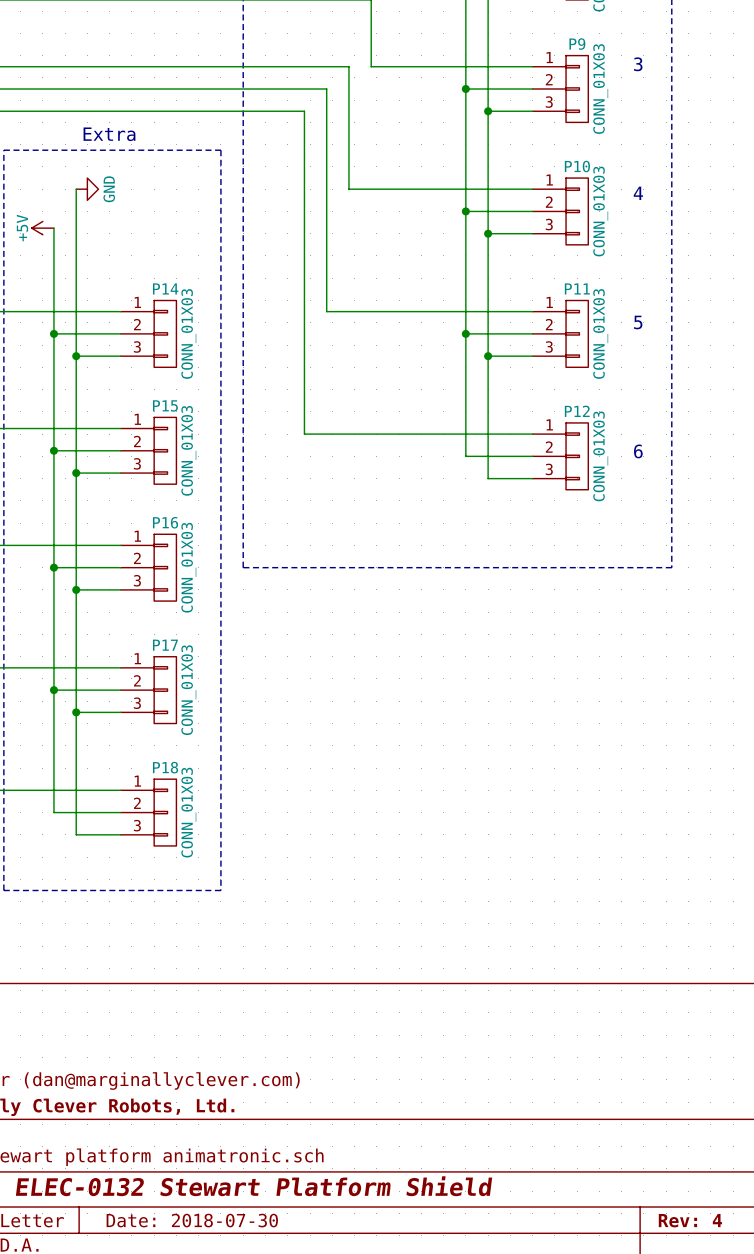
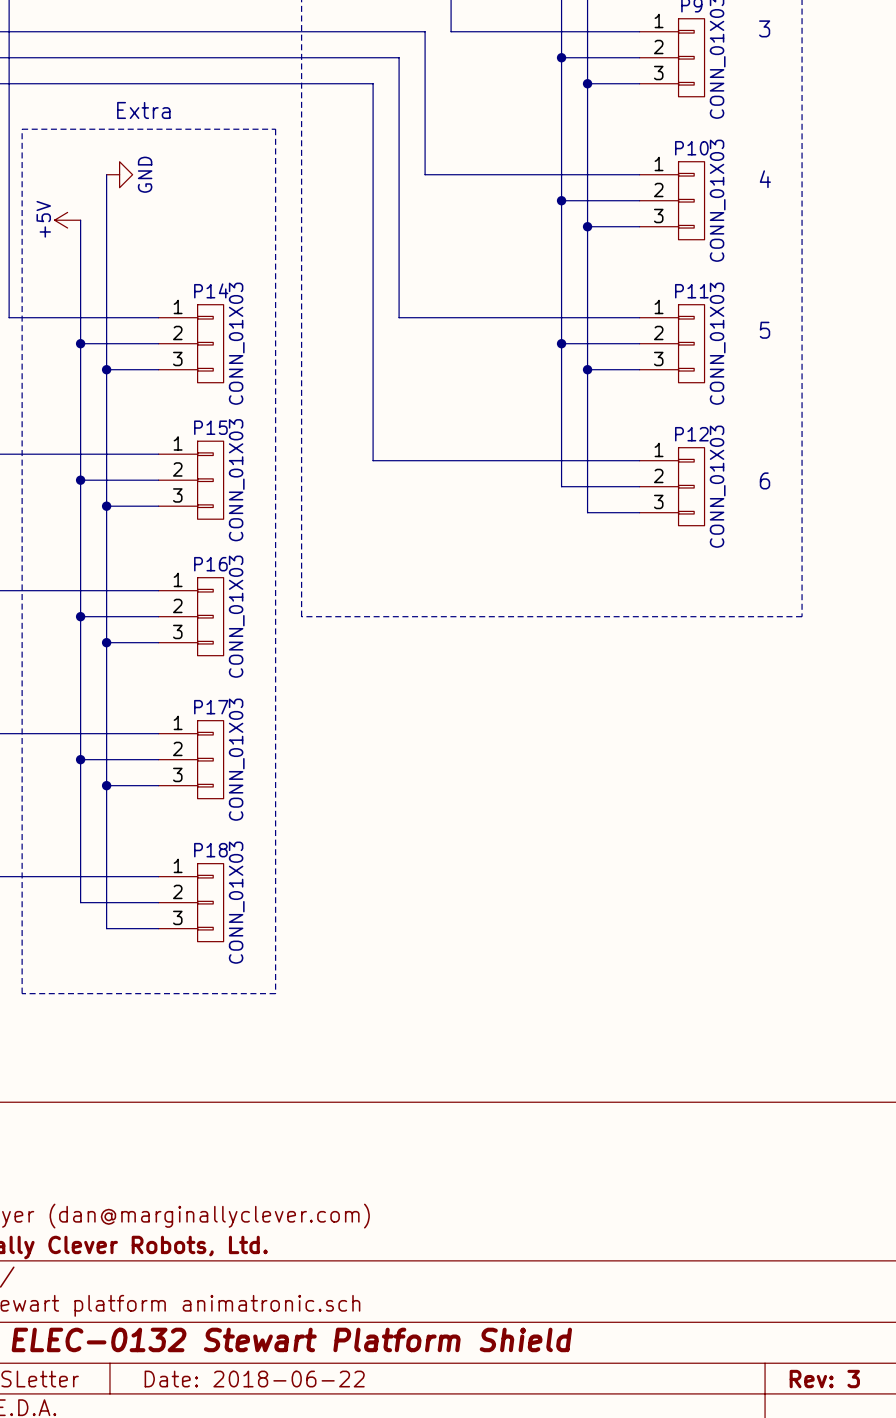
title block: Date: 2018-07-30 (192, 1220) -> Date: 2018-06-22 (254, 1379)
title block: Rev: 4 (690, 1220) -> Rev: 3 (824, 1379)

